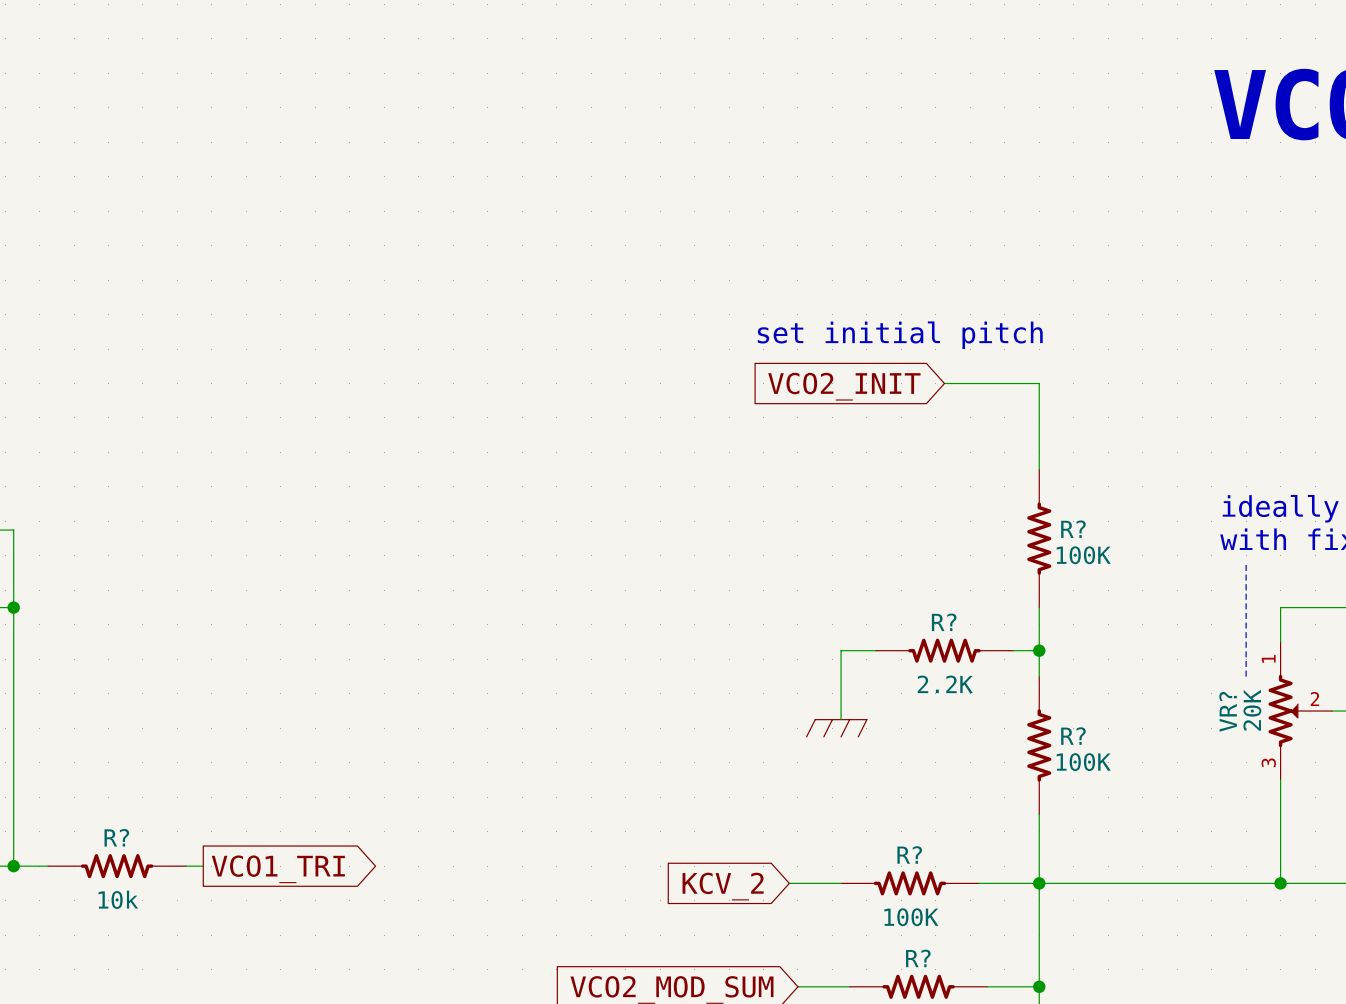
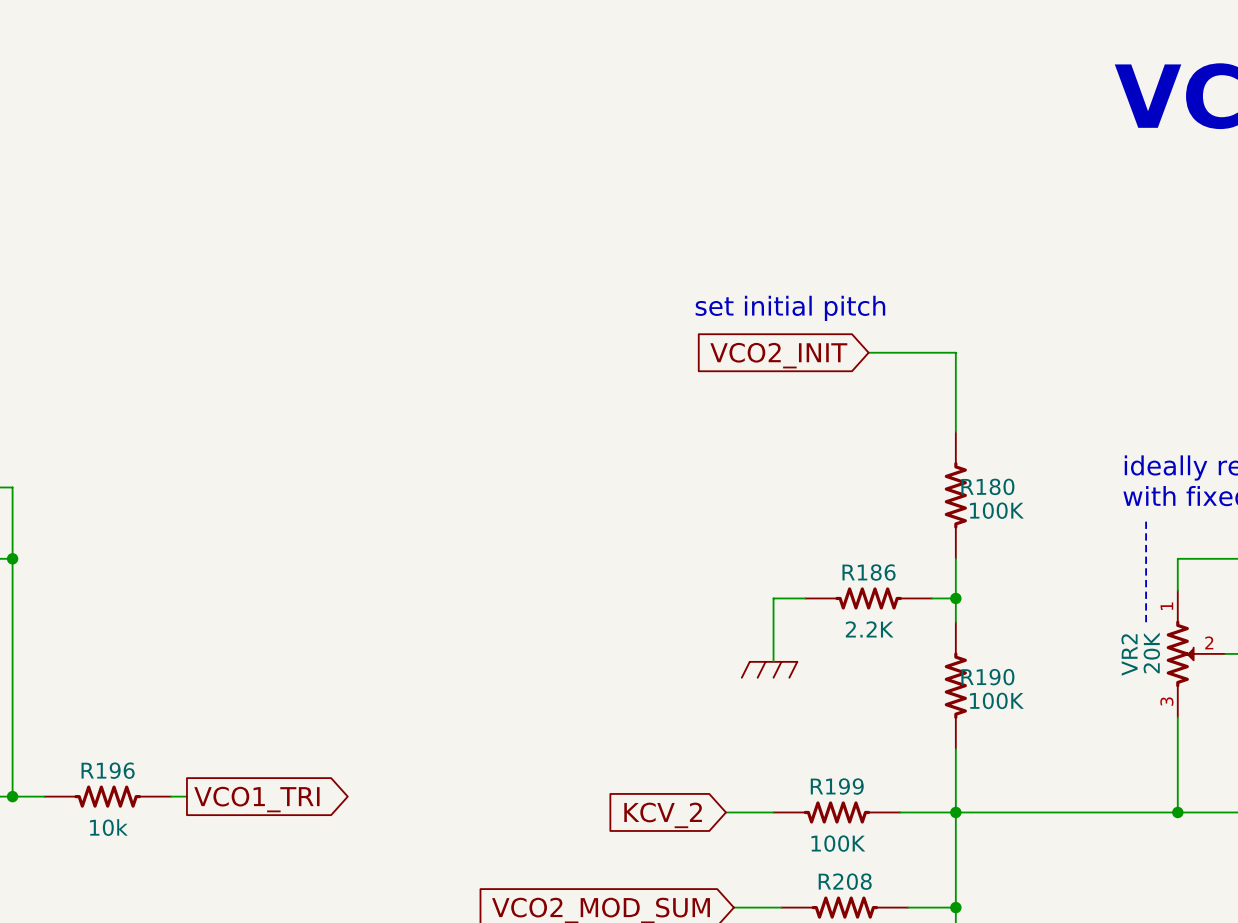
R? name: R? (1073, 529) -> R180 (987, 486)
R? name: R? (944, 622) -> R186 (869, 572)
VR? name: VR? (1228, 711) -> VR2 (1129, 654)
R? name: R? (1073, 736) -> R190 (987, 677)
R? name: R? (116, 837) -> R196 (108, 770)
R? name: R? (909, 855) -> R199 (837, 786)
R? name: R? (918, 958) -> R208 (845, 881)

